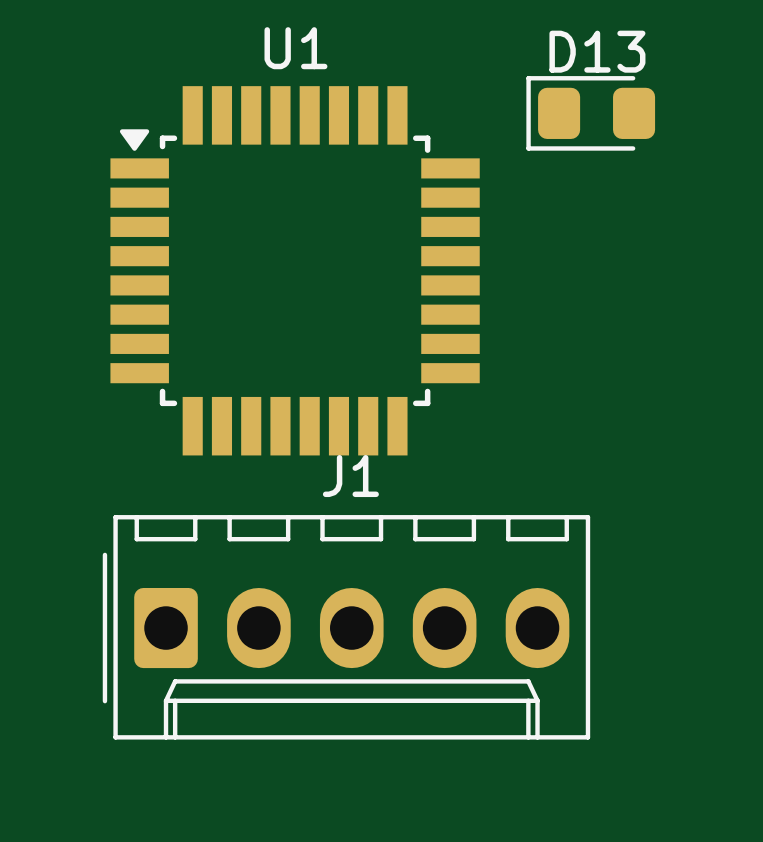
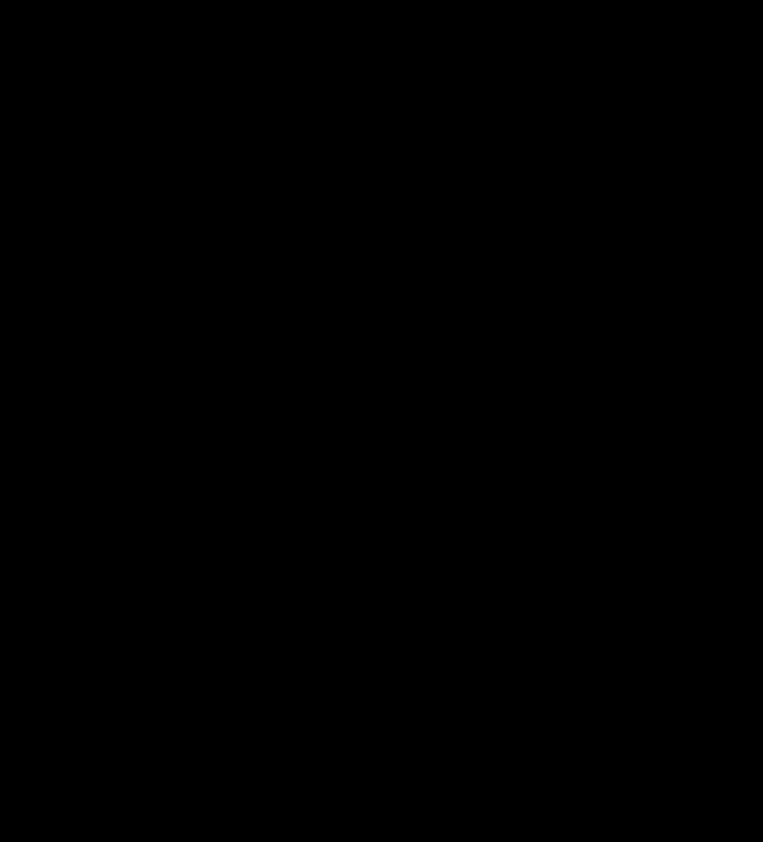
D13: (590, 113) -> none
U1: (295, 270) -> none
J1: (346, 627) -> none

